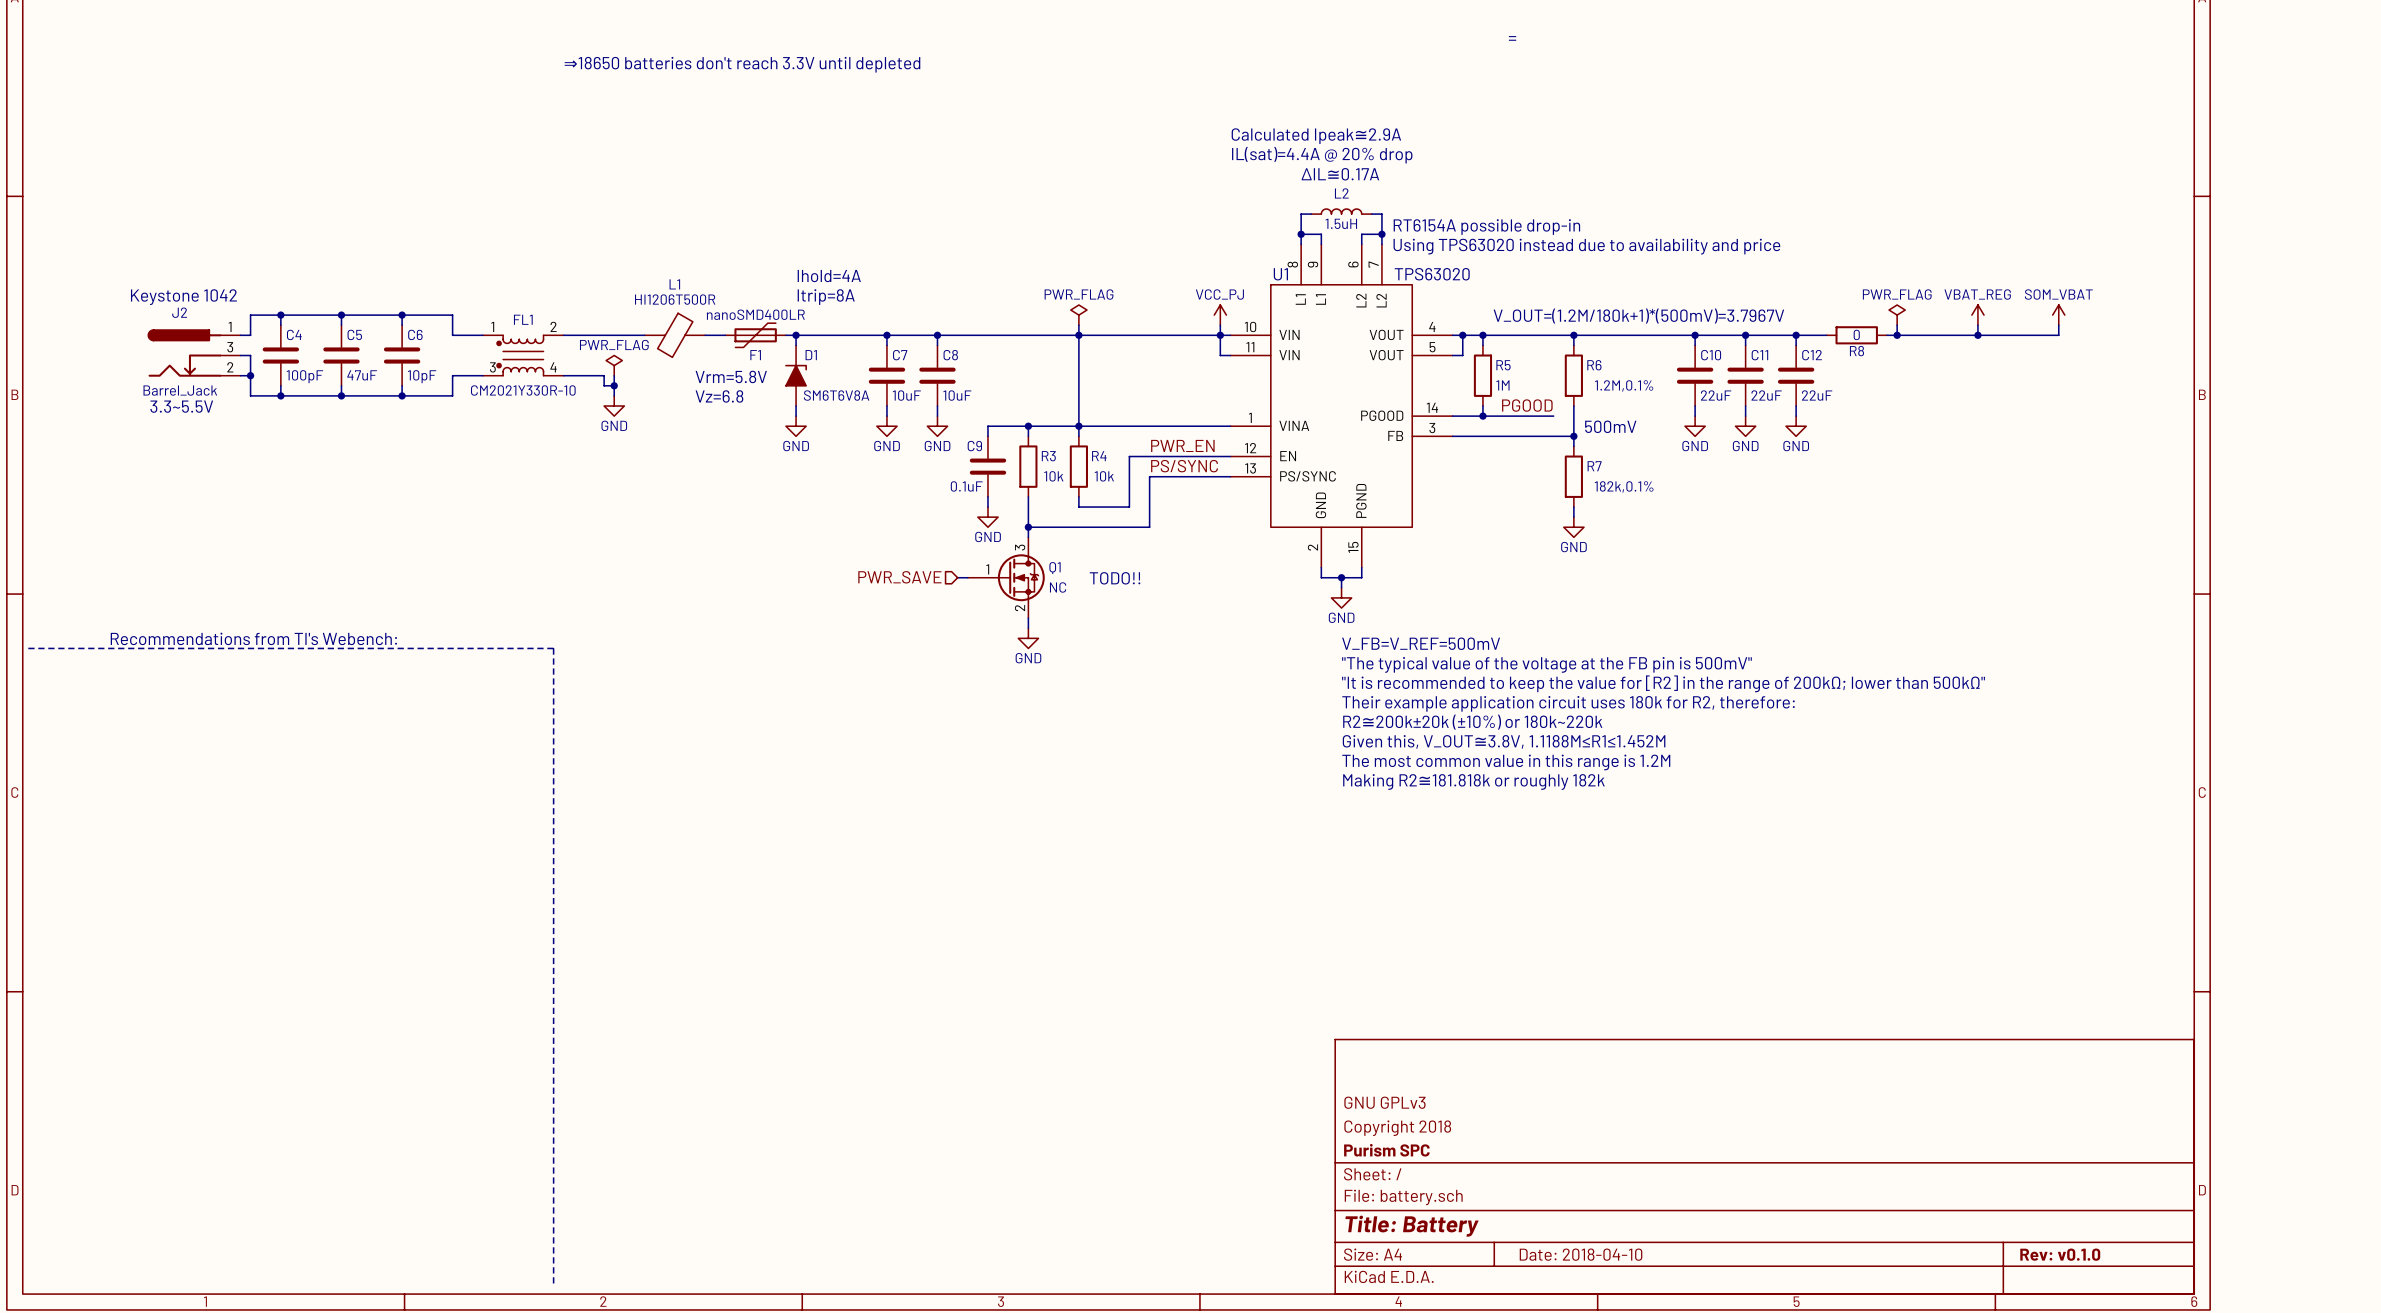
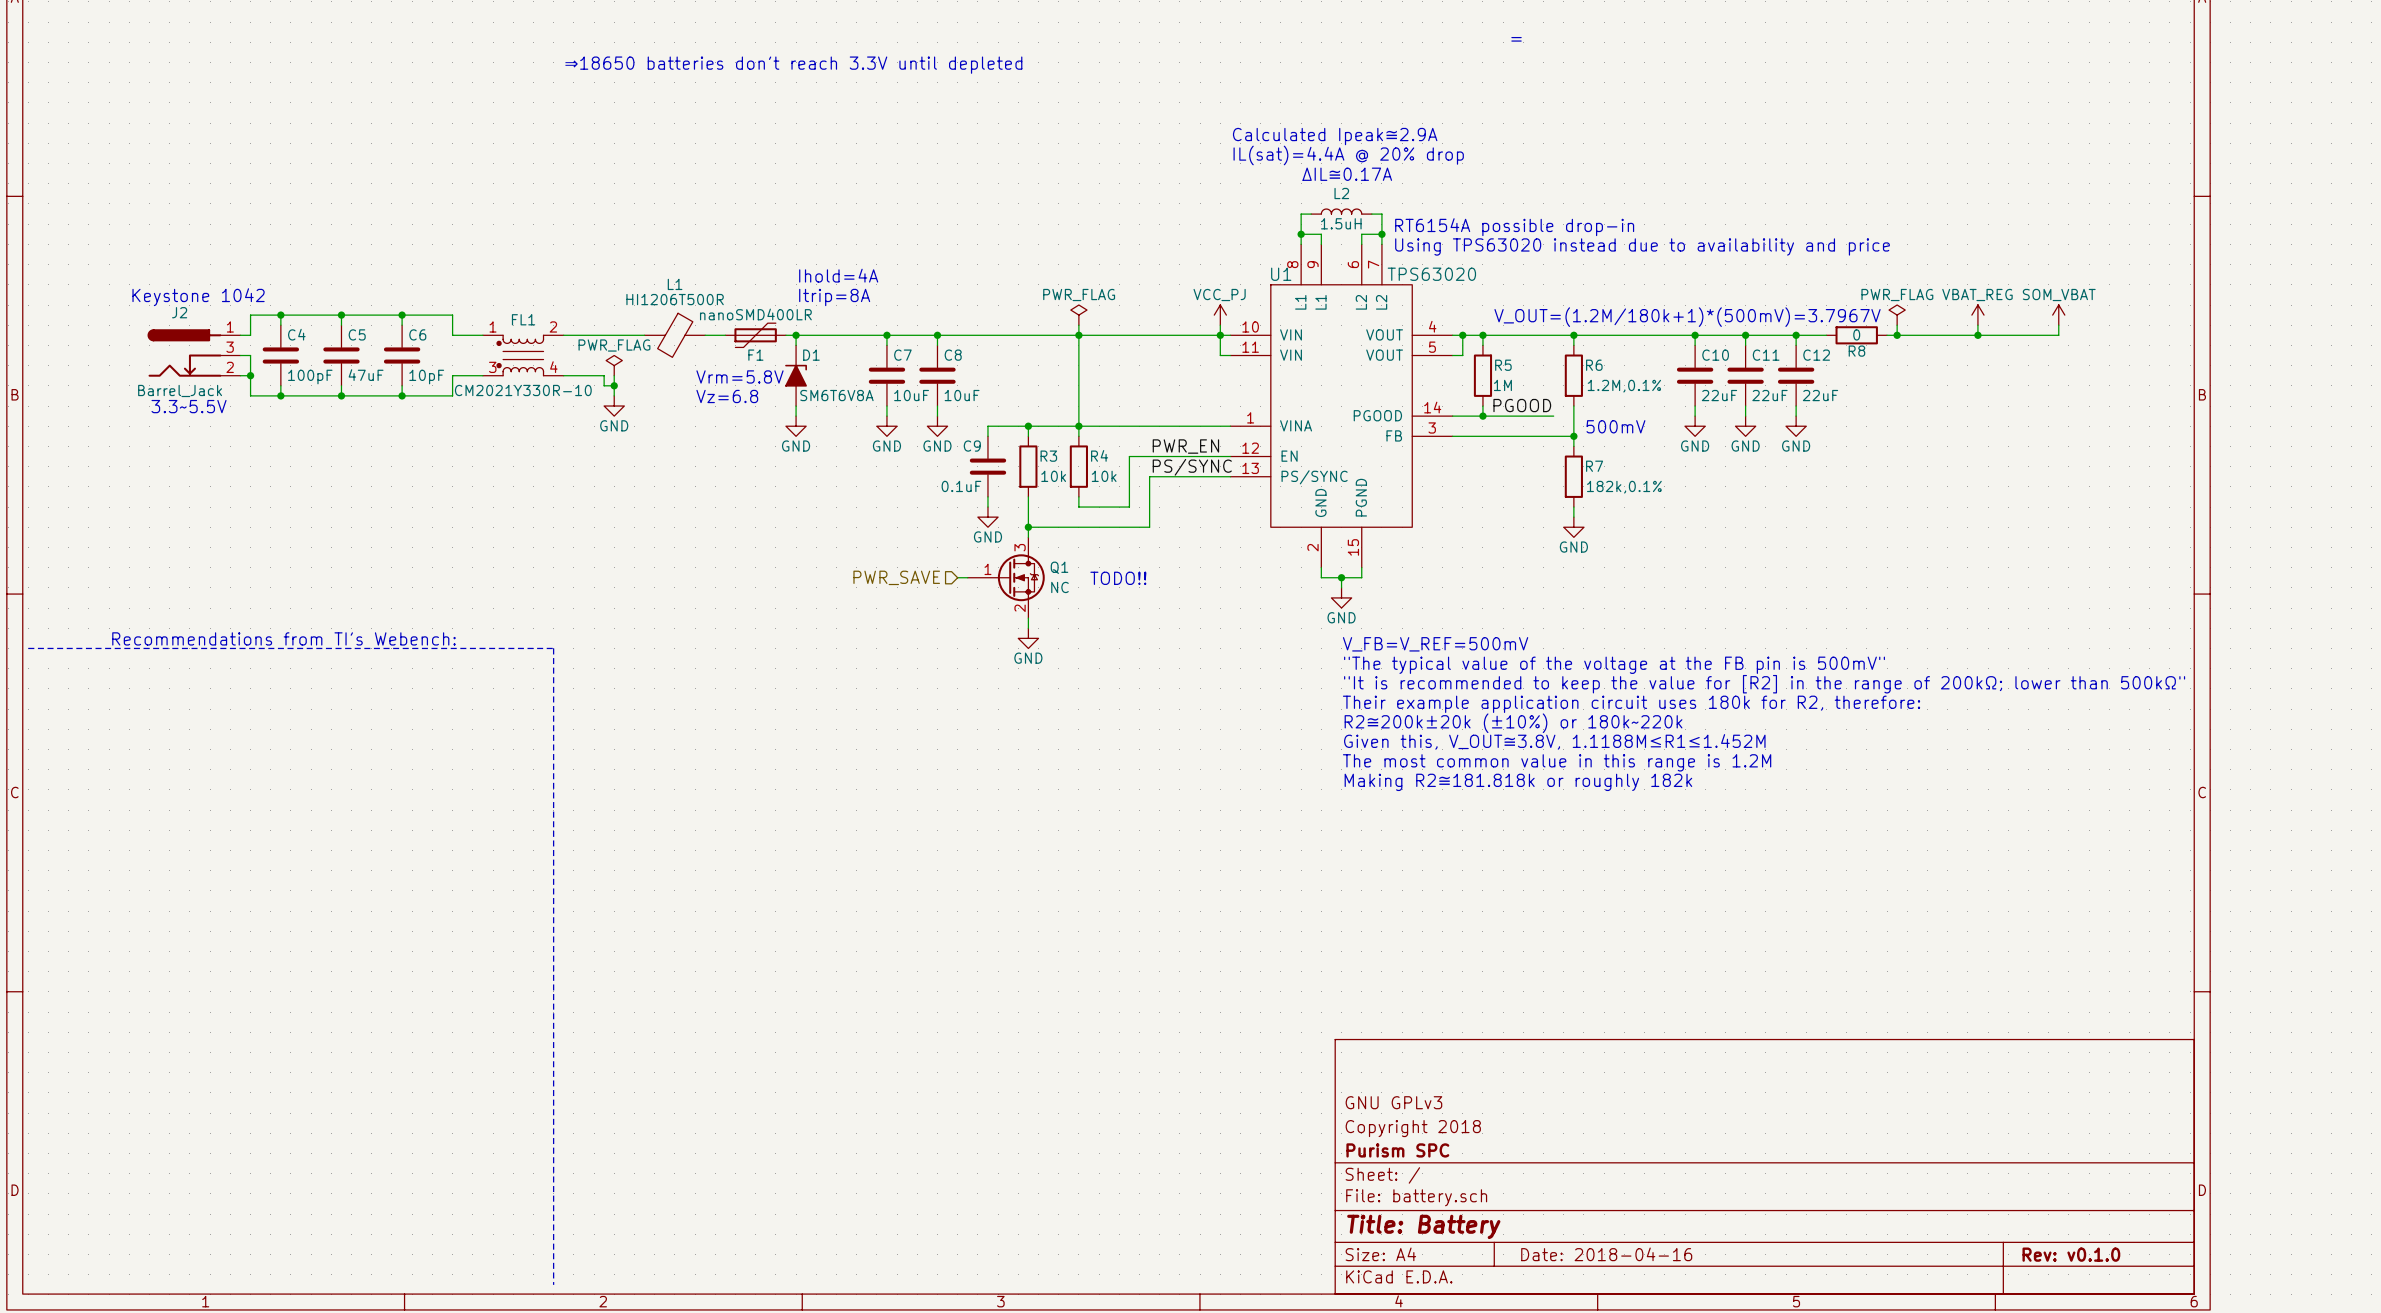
title block: Date: 2018-04-10 (1581, 1254) -> Date: 2018-04-16 (1606, 1254)

